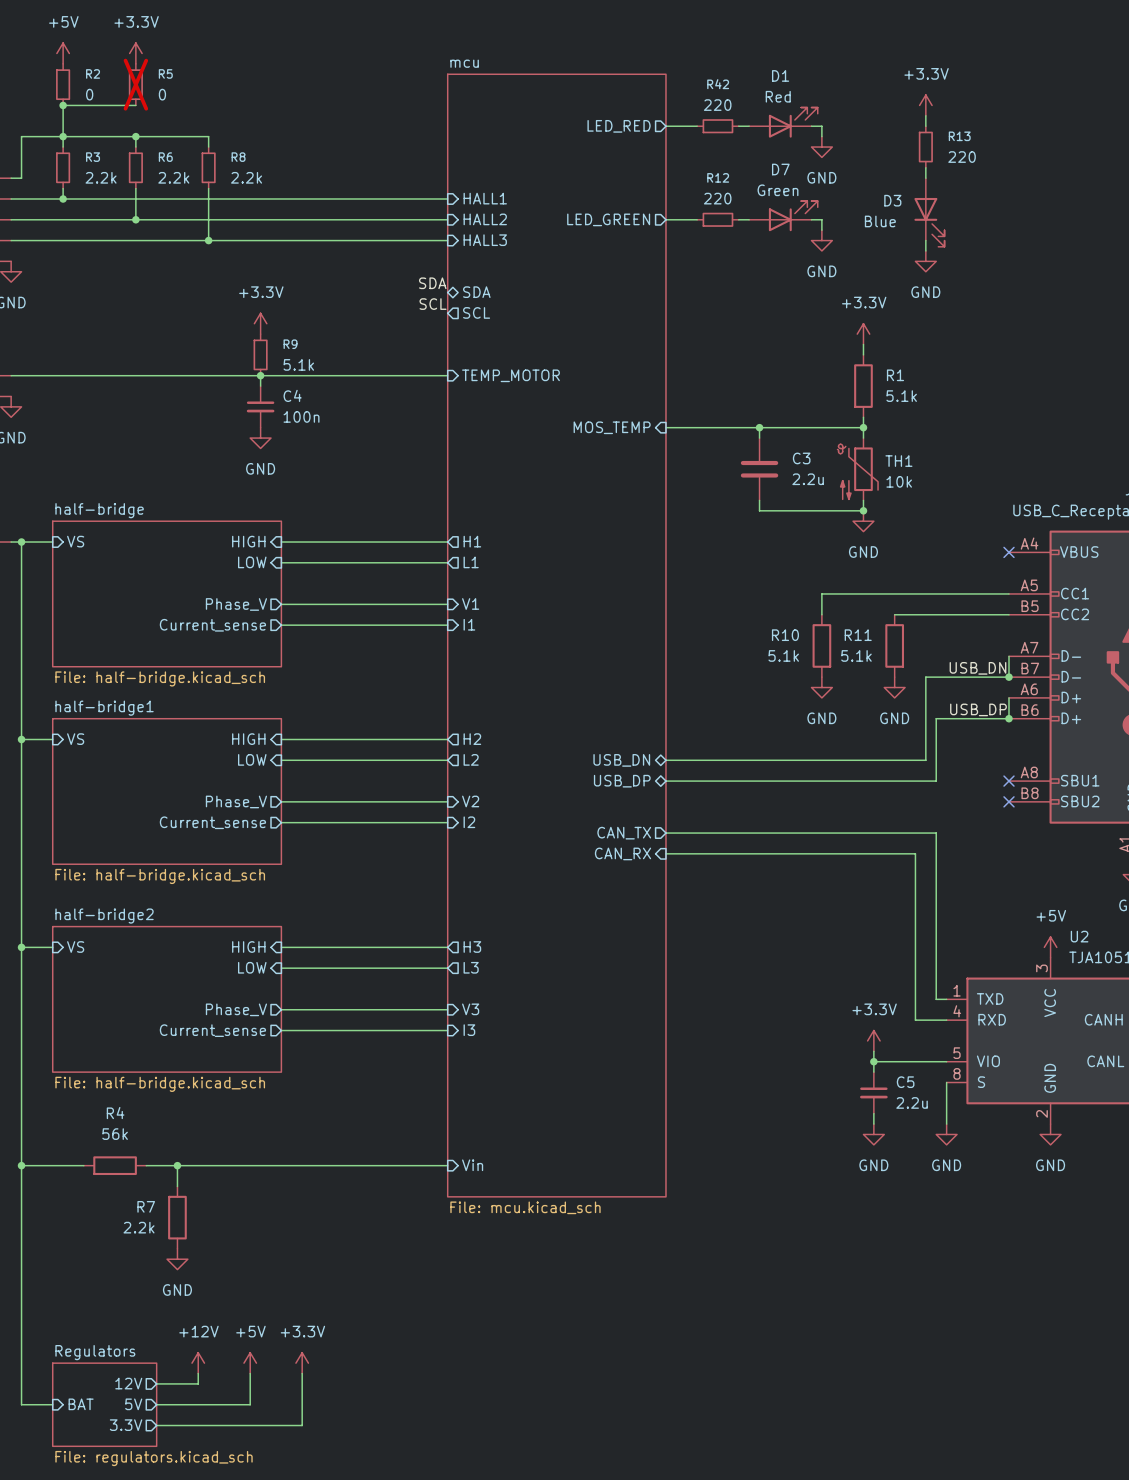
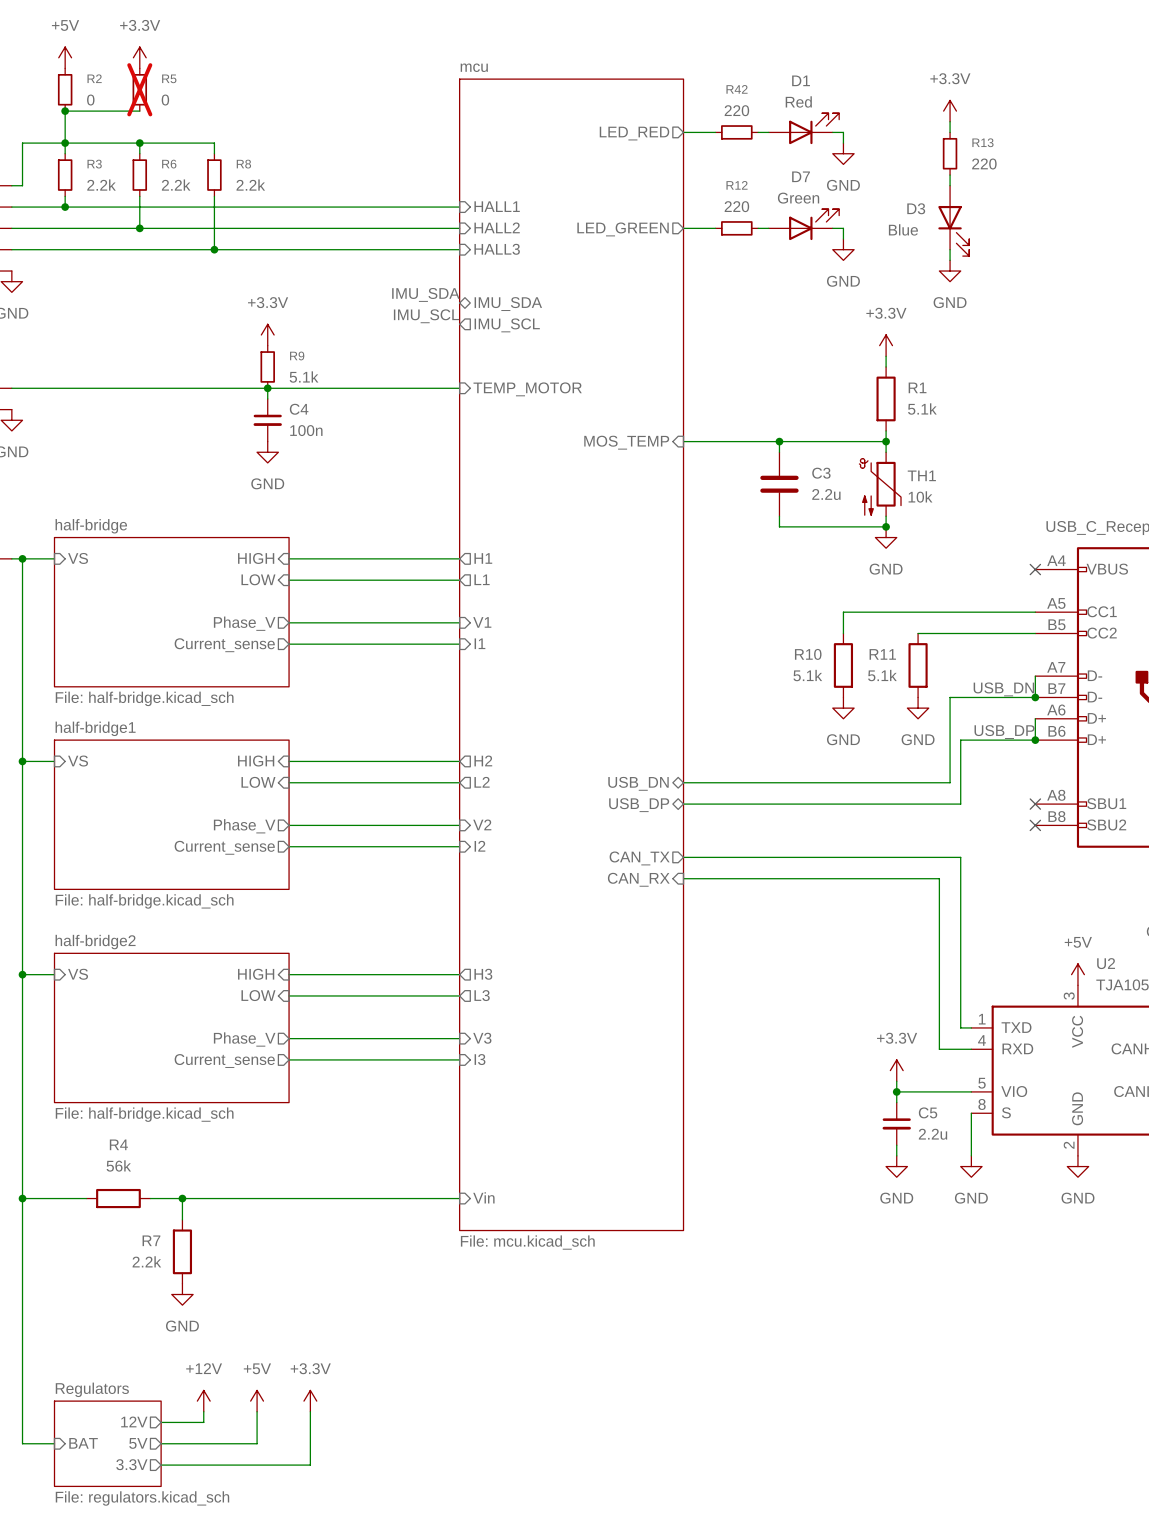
label: SDA (432, 283) -> IMU_SDA (425, 294)
sheet pin: SDA (476, 292) -> IMU_SDA (508, 304)
label: SCL (433, 304) -> IMU_SCL (426, 316)
sheet pin: SCL (476, 312) -> IMU_SCL (507, 325)

